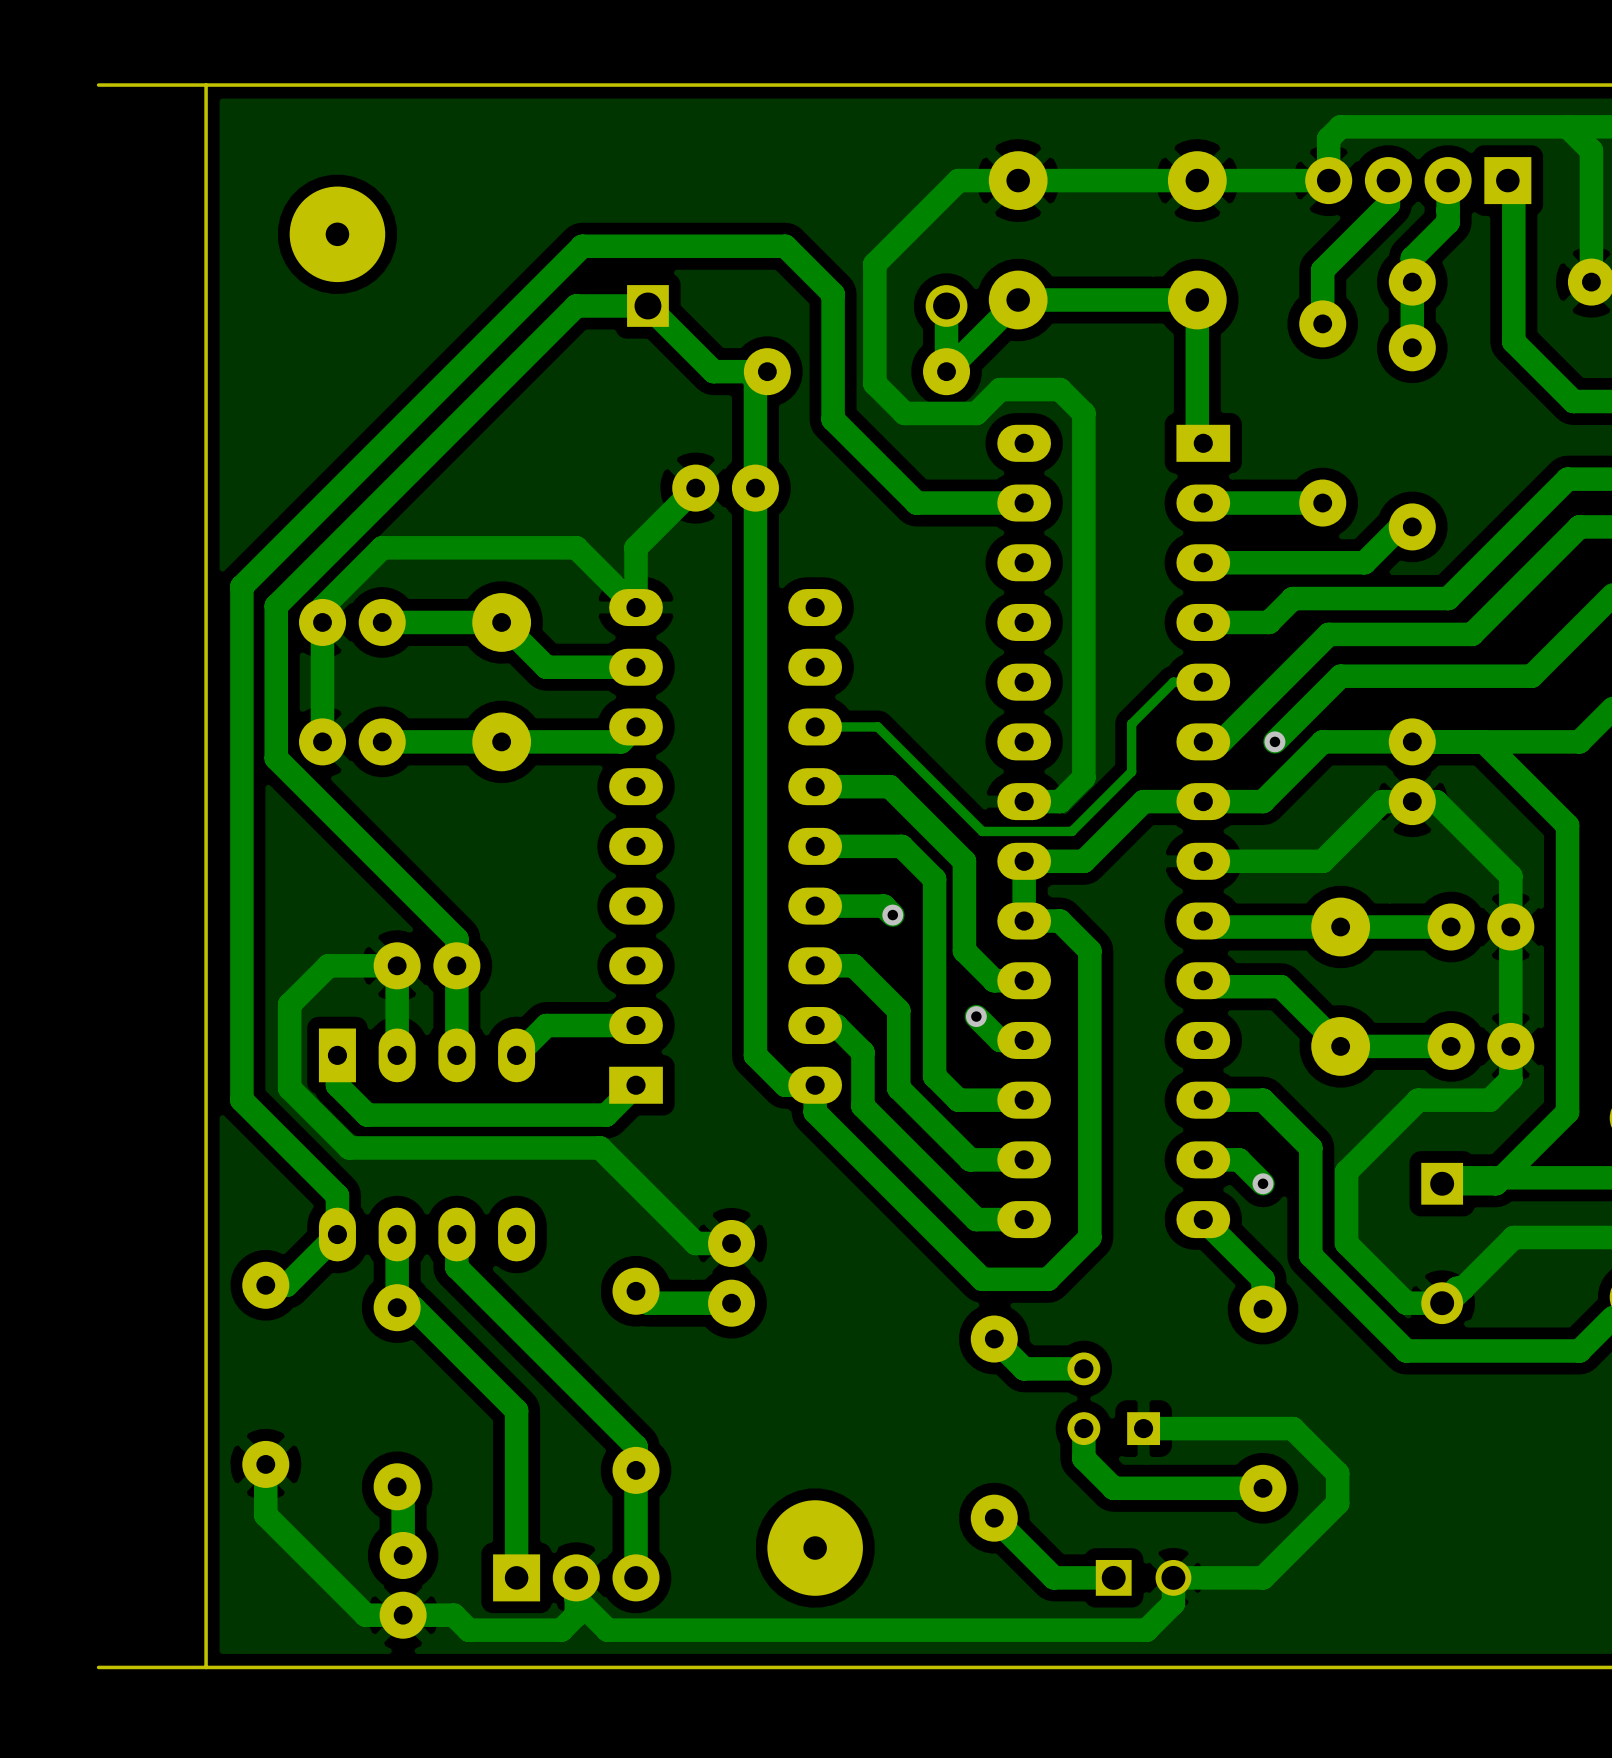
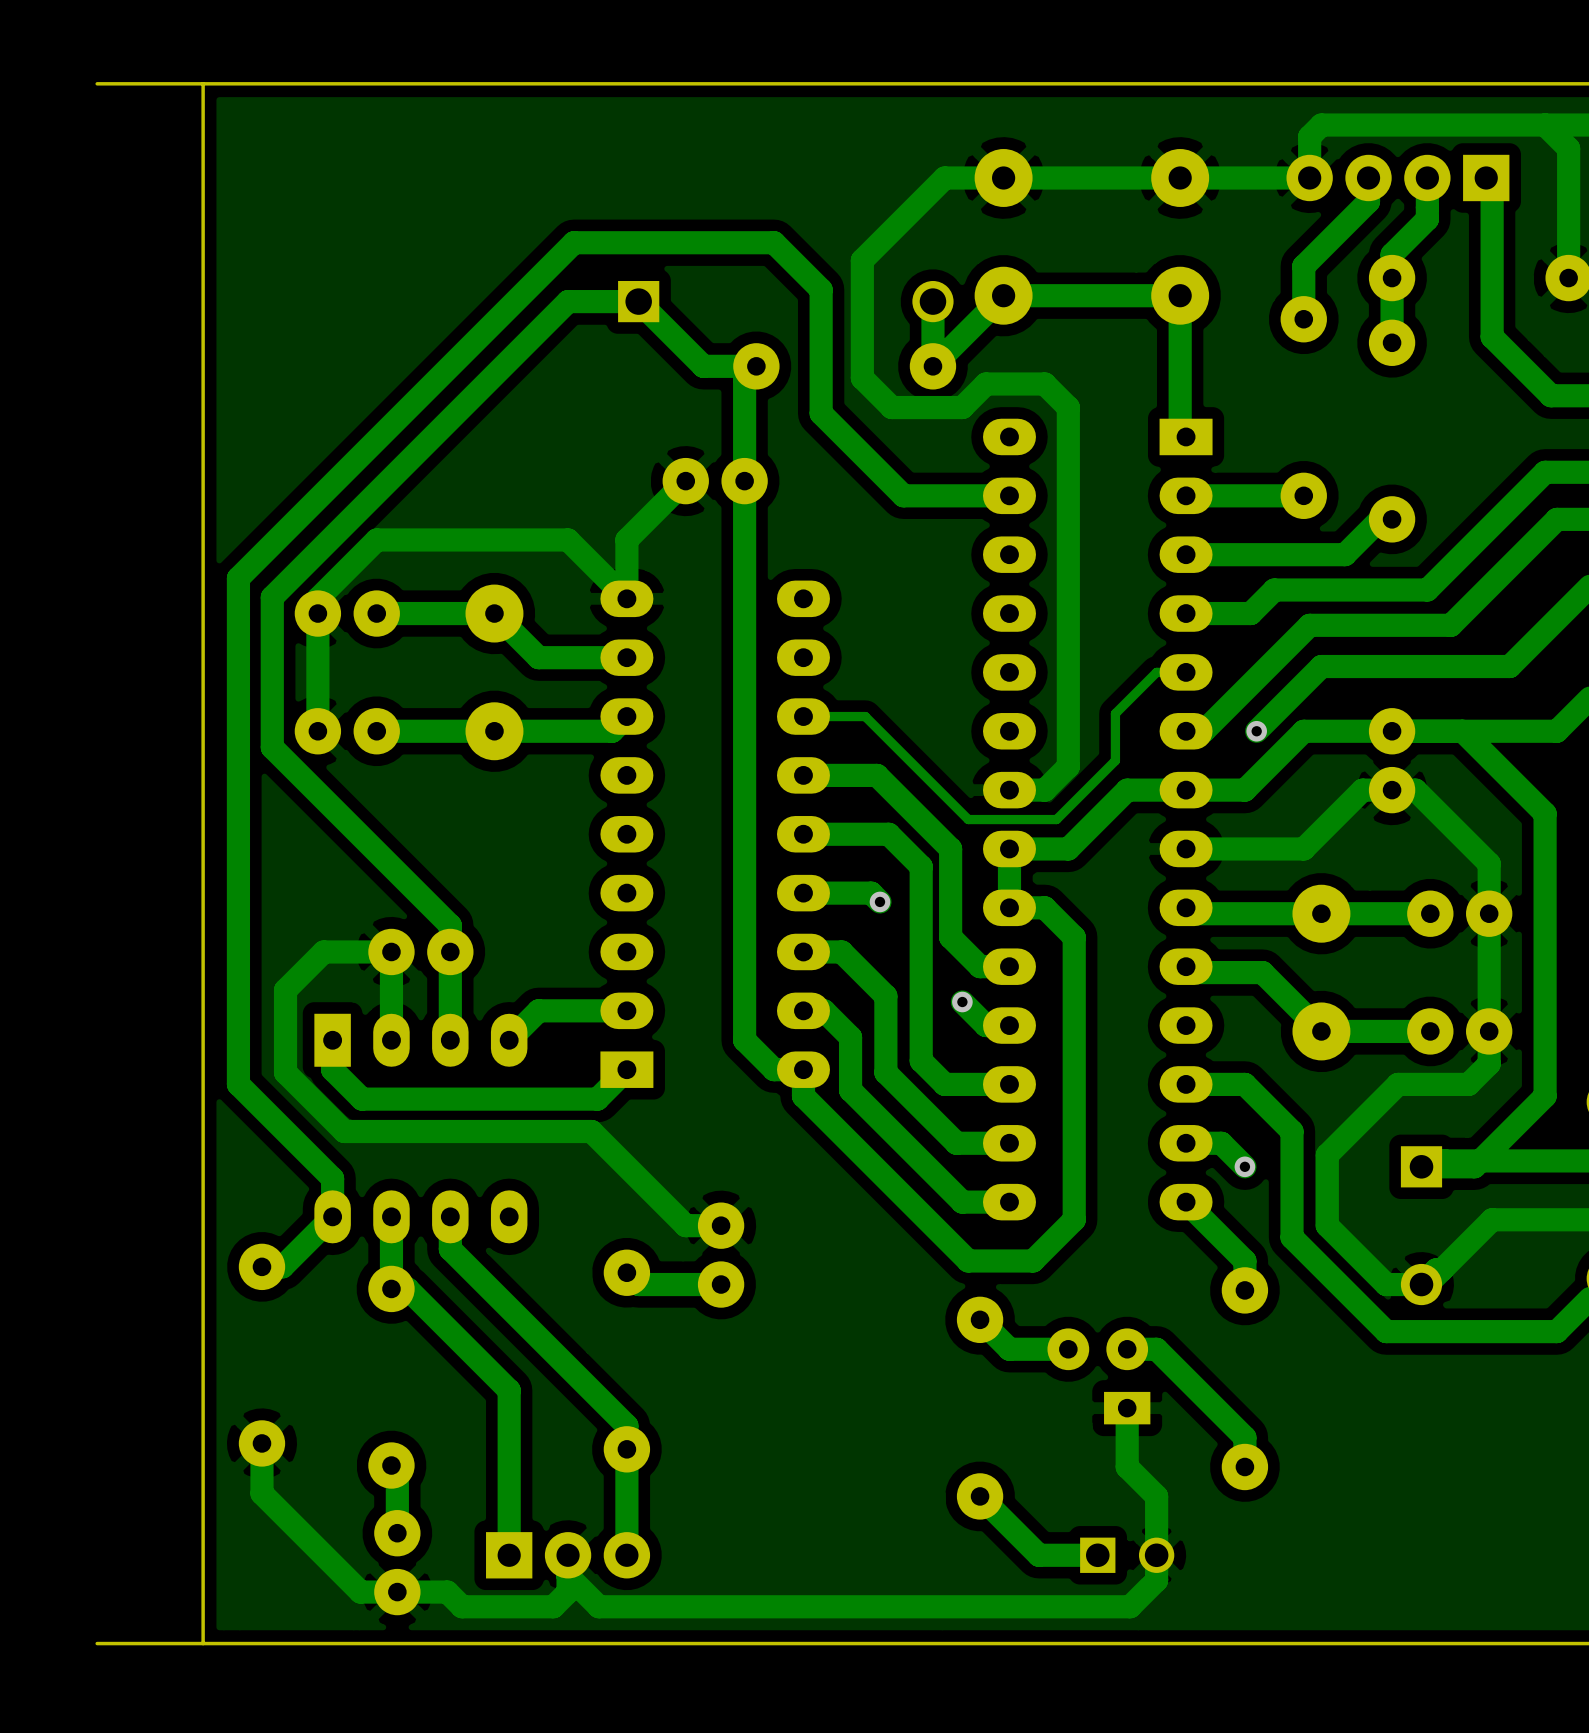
part: (337, 234) -> none
part footprint: [1067, 1352, 1161, 1446] -> [1047, 1328, 1151, 1425]
track: (1083, 1428) (1083, 1458) (1113, 1488) (1263, 1488) -> (1127, 1349) (1156, 1349) (1244, 1437) (1244, 1466)
track: (1143, 1428) (1292, 1428) (1337, 1473) (1337, 1503) (1263, 1577) (1173, 1577) -> (1127, 1408) (1127, 1466) (1156, 1496) (1156, 1555)
part: (815, 1548) -> none

